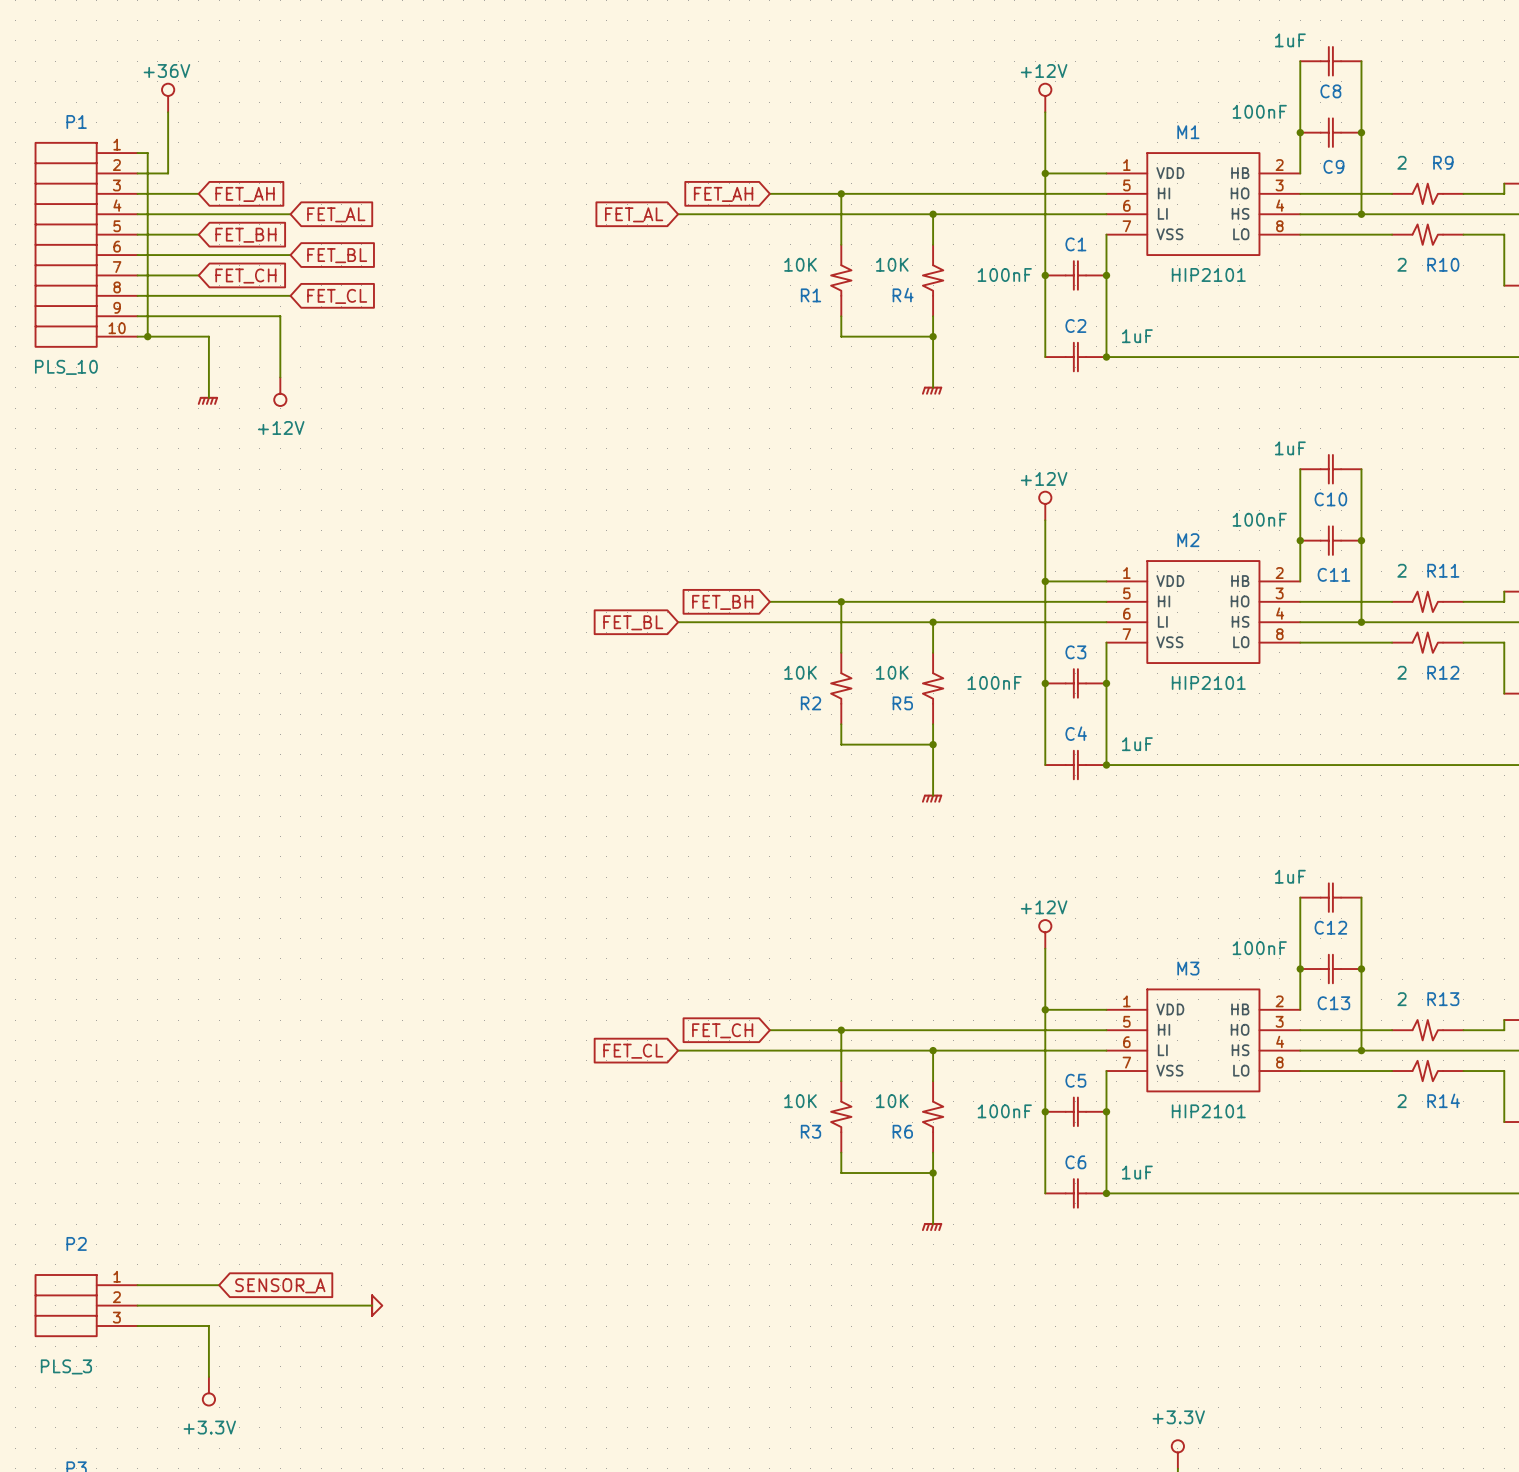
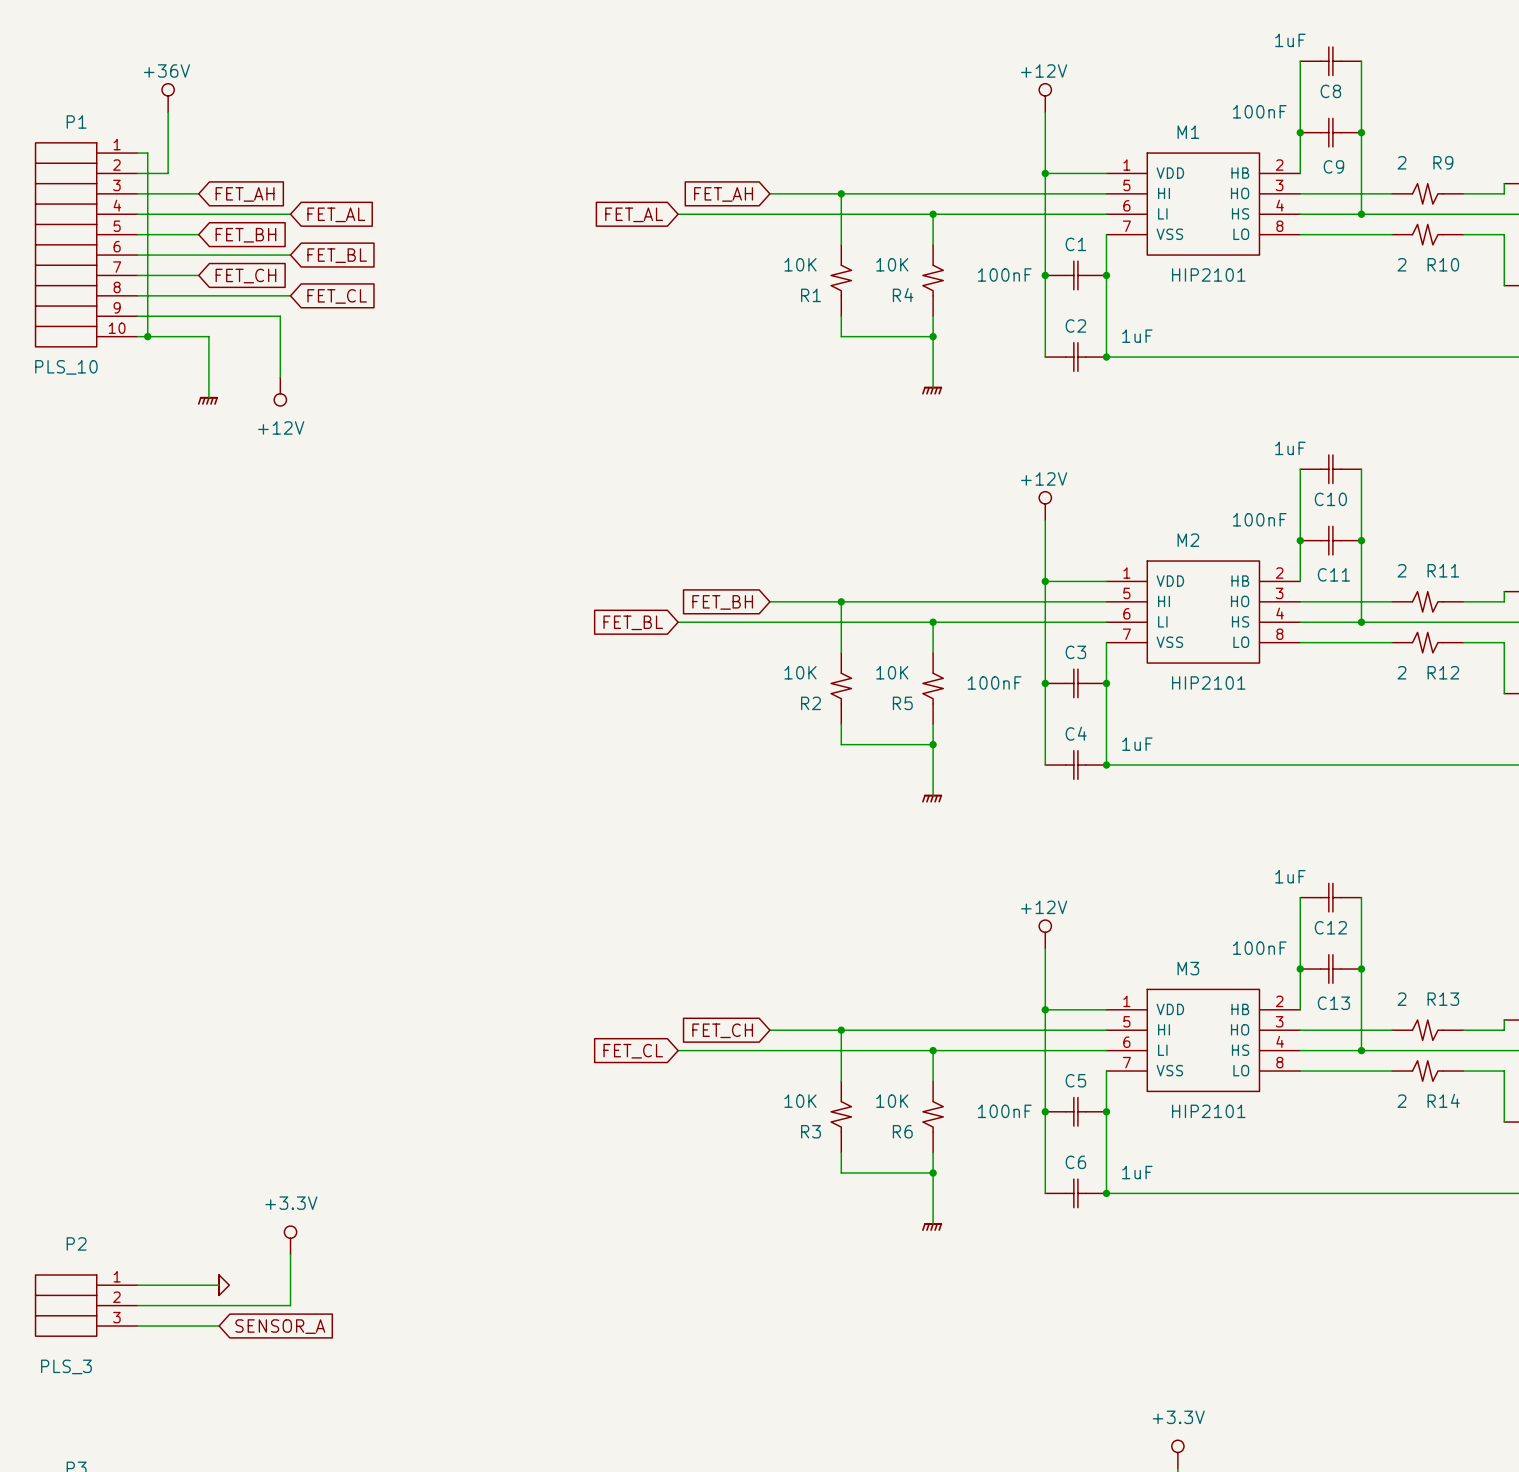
global label position: SENSOR_A (280, 1285) -> SENSOR_A (280, 1326)
wire: (290, 1305) (372, 1305) -> (290, 1305) (290, 1254)
power symbol position: (377, 1305) -> (224, 1285)
wire: (208, 1326) (208, 1376) -> (208, 1326) (219, 1326)
power symbol rotation: 0° (208, 1391) -> 180° (290, 1240)
power symbol position: +3.3V (208, 1391) -> +3.3V (290, 1240)

